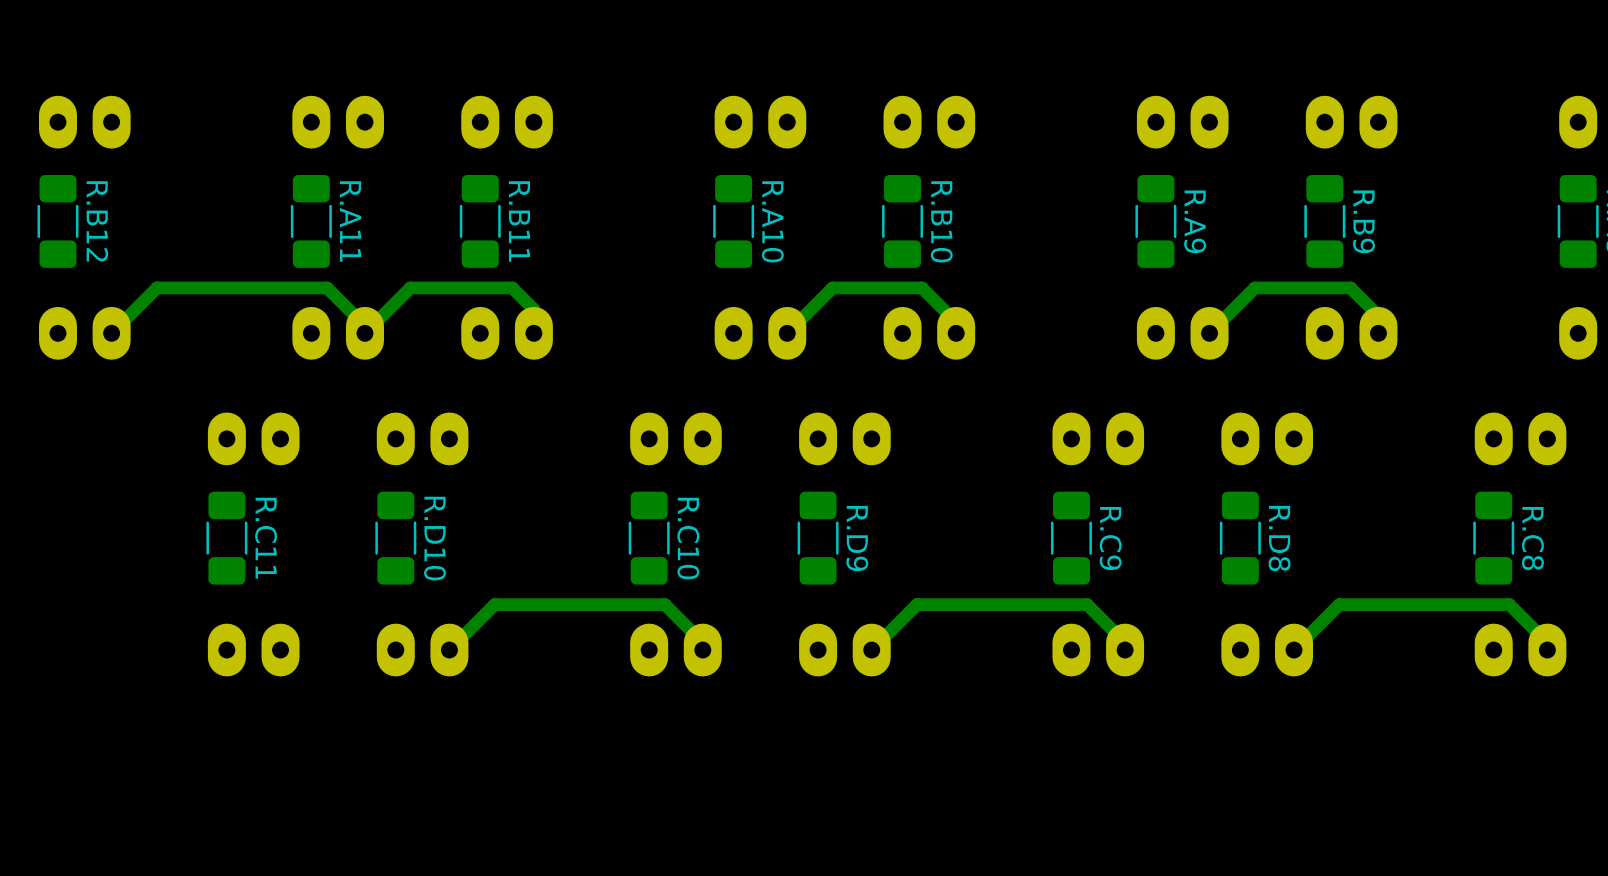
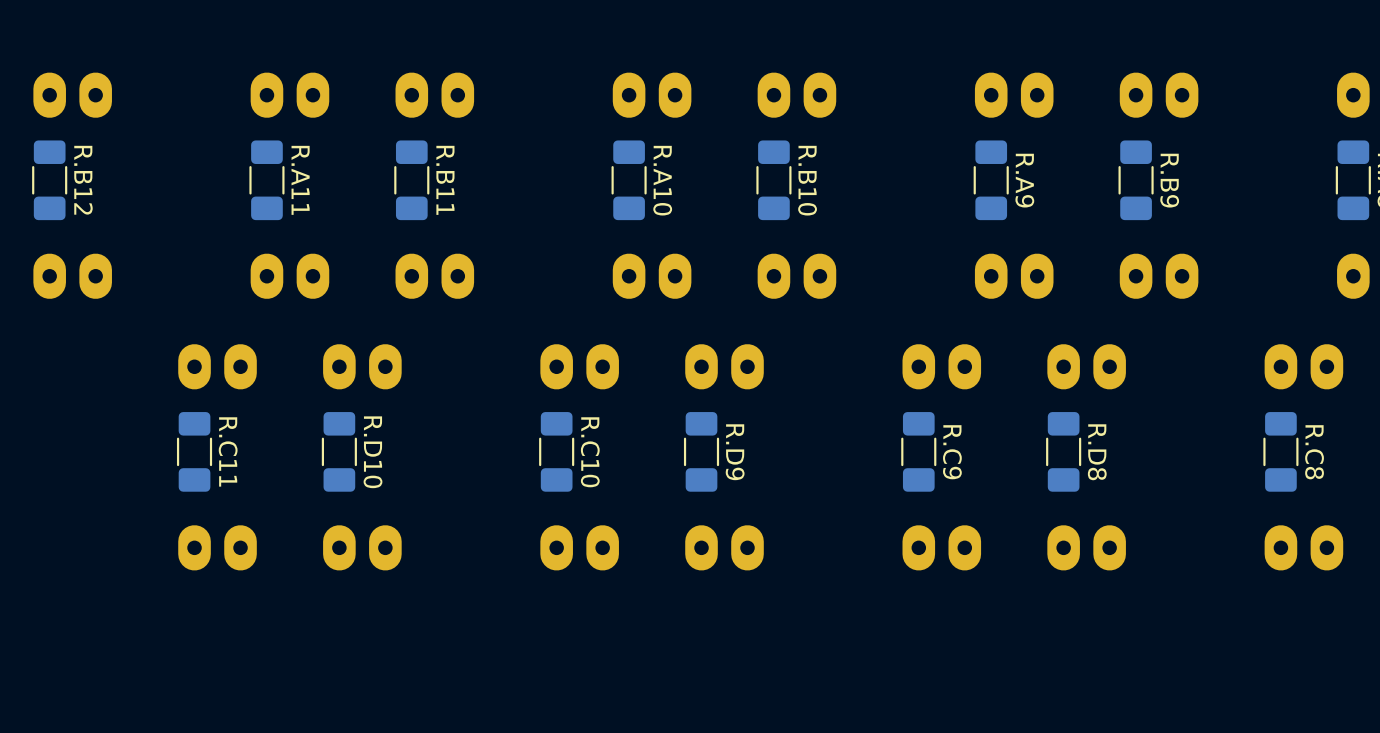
bottom track: (533, 333) (533, 309) (512, 287) (410, 287) (364, 333) (364, 325) (327, 287) (157, 287) (111, 333) -> none
bottom track: (956, 333) (956, 322) (921, 287) (832, 287) (787, 333) -> none
bottom track: (1378, 333) (1378, 315) (1350, 287) (1254, 287) (1209, 333) -> none
bottom track: (702, 650) (702, 642) (664, 604) (494, 604) (449, 650) -> none
bottom track: (1125, 650) (1125, 642) (1087, 604) (917, 604) (871, 650) -> none
bottom track: (1547, 650) (1547, 642) (1509, 604) (1339, 604) (1294, 650) -> none

